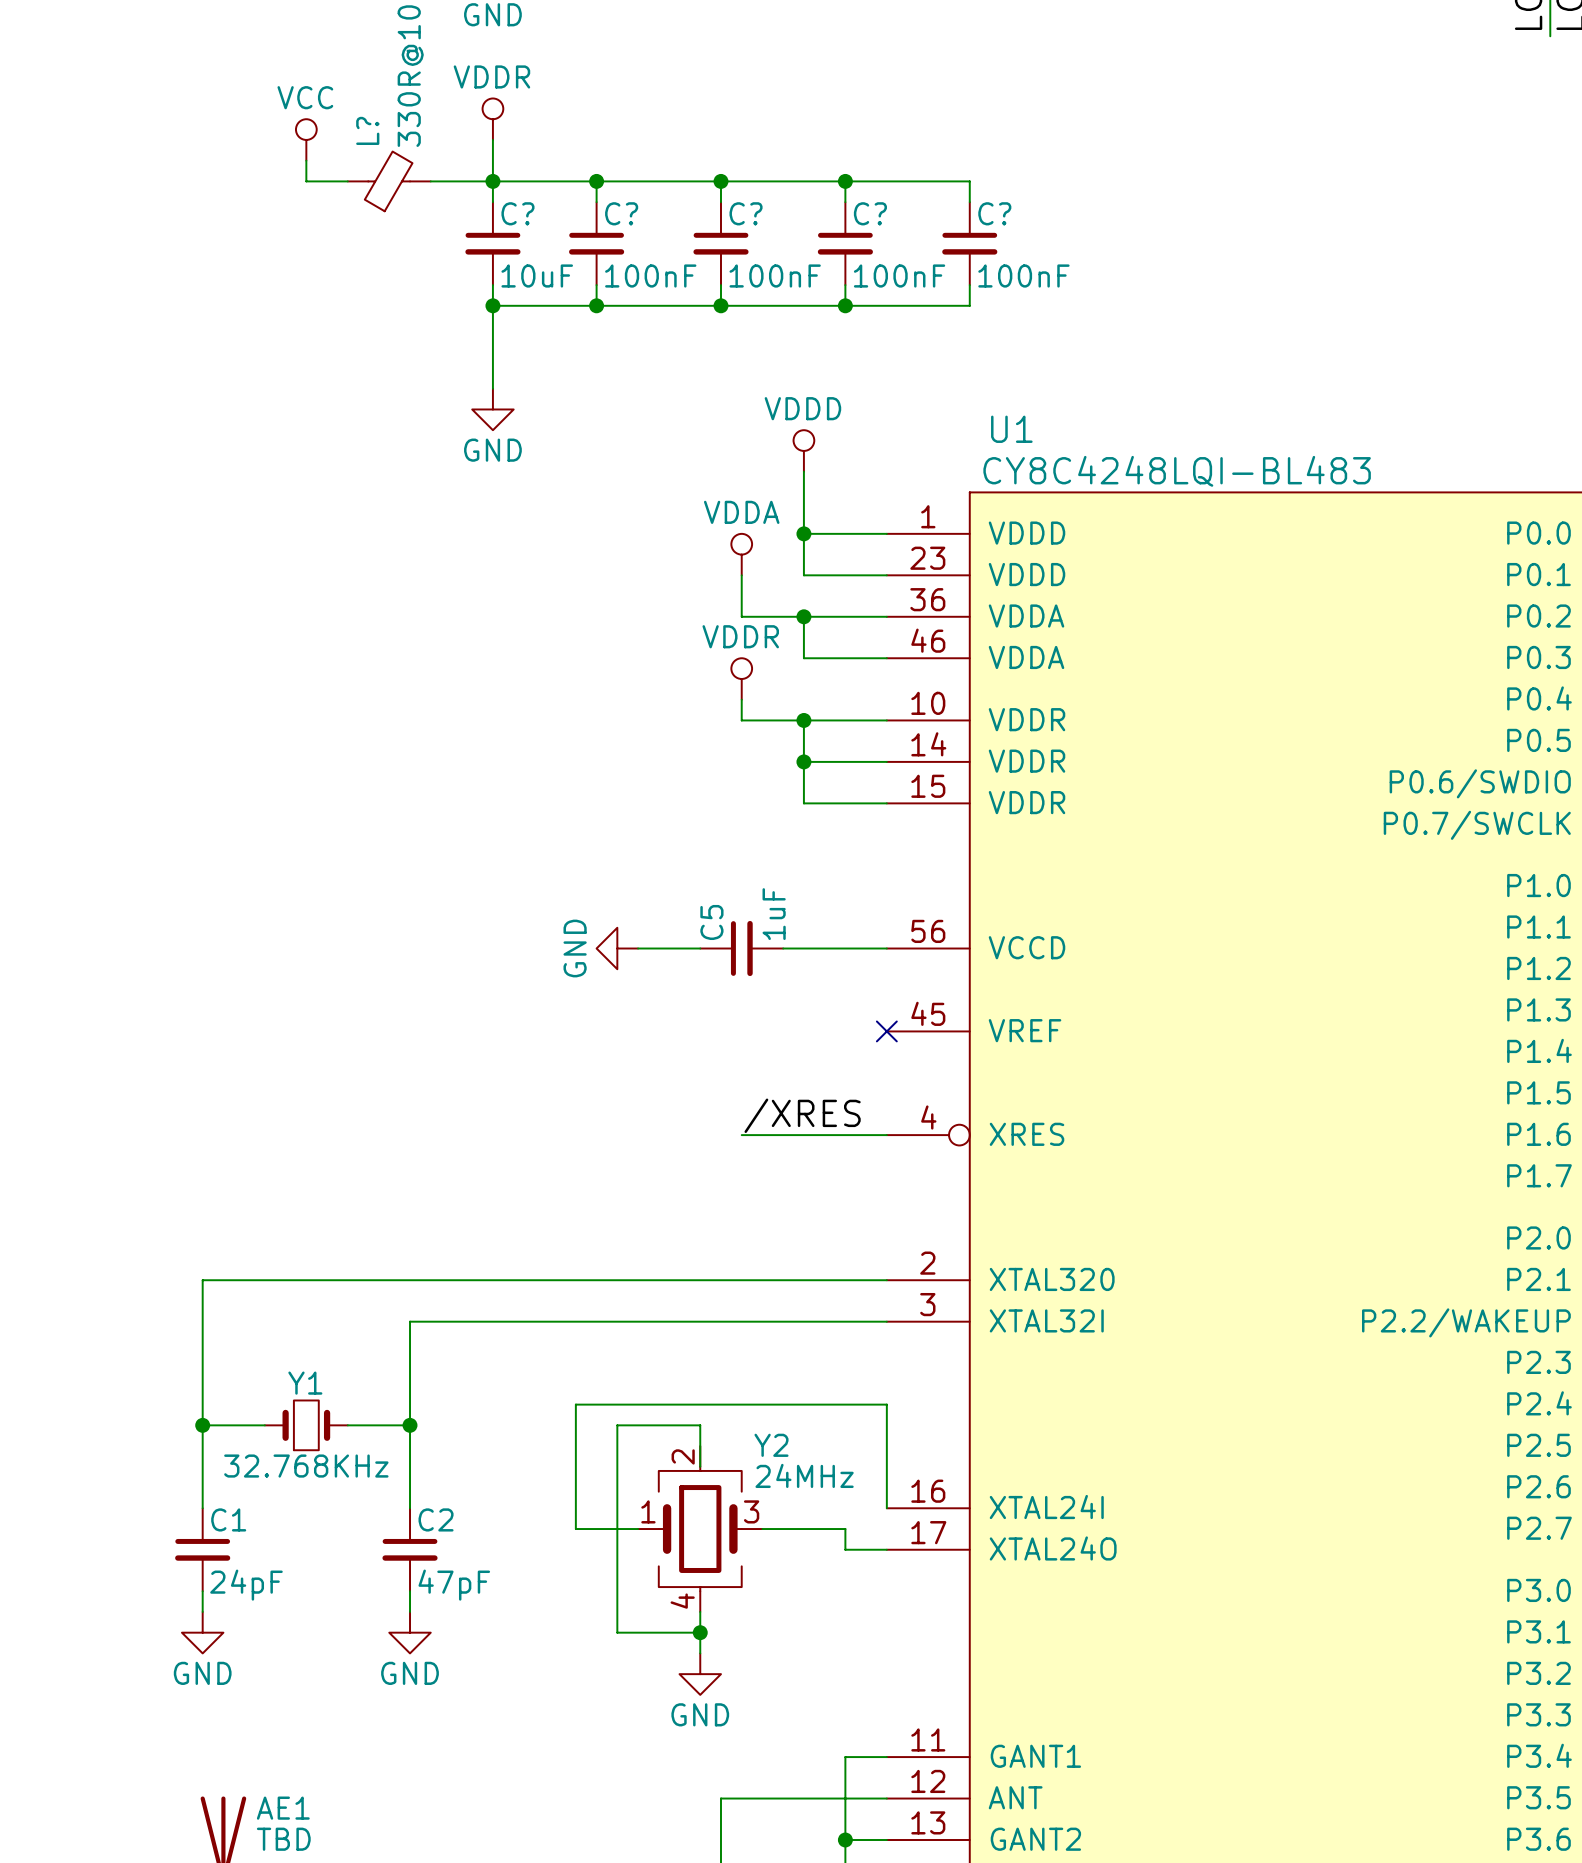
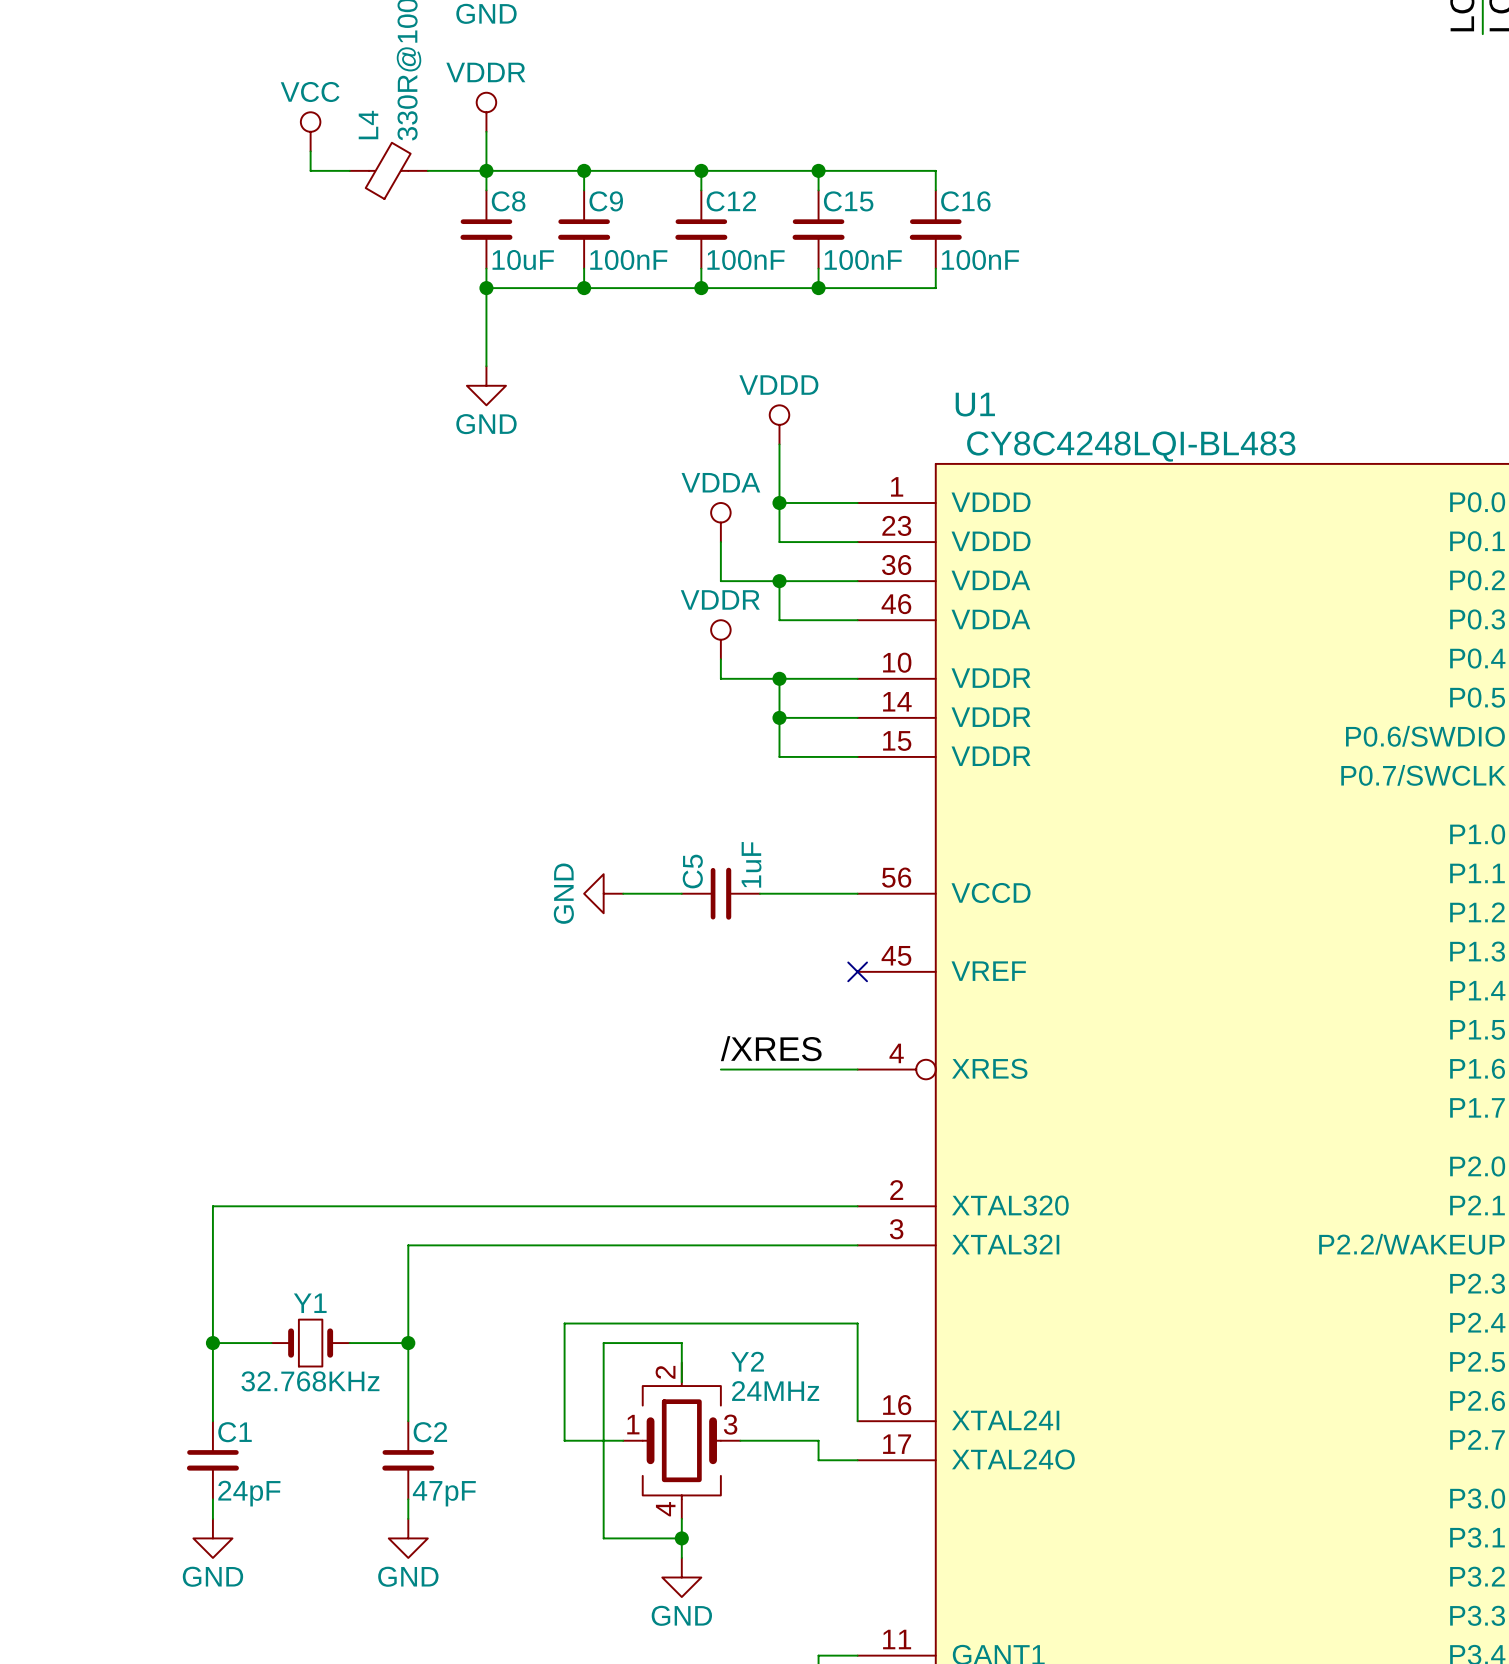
L? name: L? (367, 130) -> L4 (368, 125)
C? name: C? (517, 213) -> C8 (508, 201)
C? name: C? (621, 213) -> C9 (606, 201)
C? name: C? (746, 213) -> C12 (731, 201)
C? name: C? (870, 213) -> C15 (848, 201)
C? name: C? (994, 213) -> C16 (965, 201)

